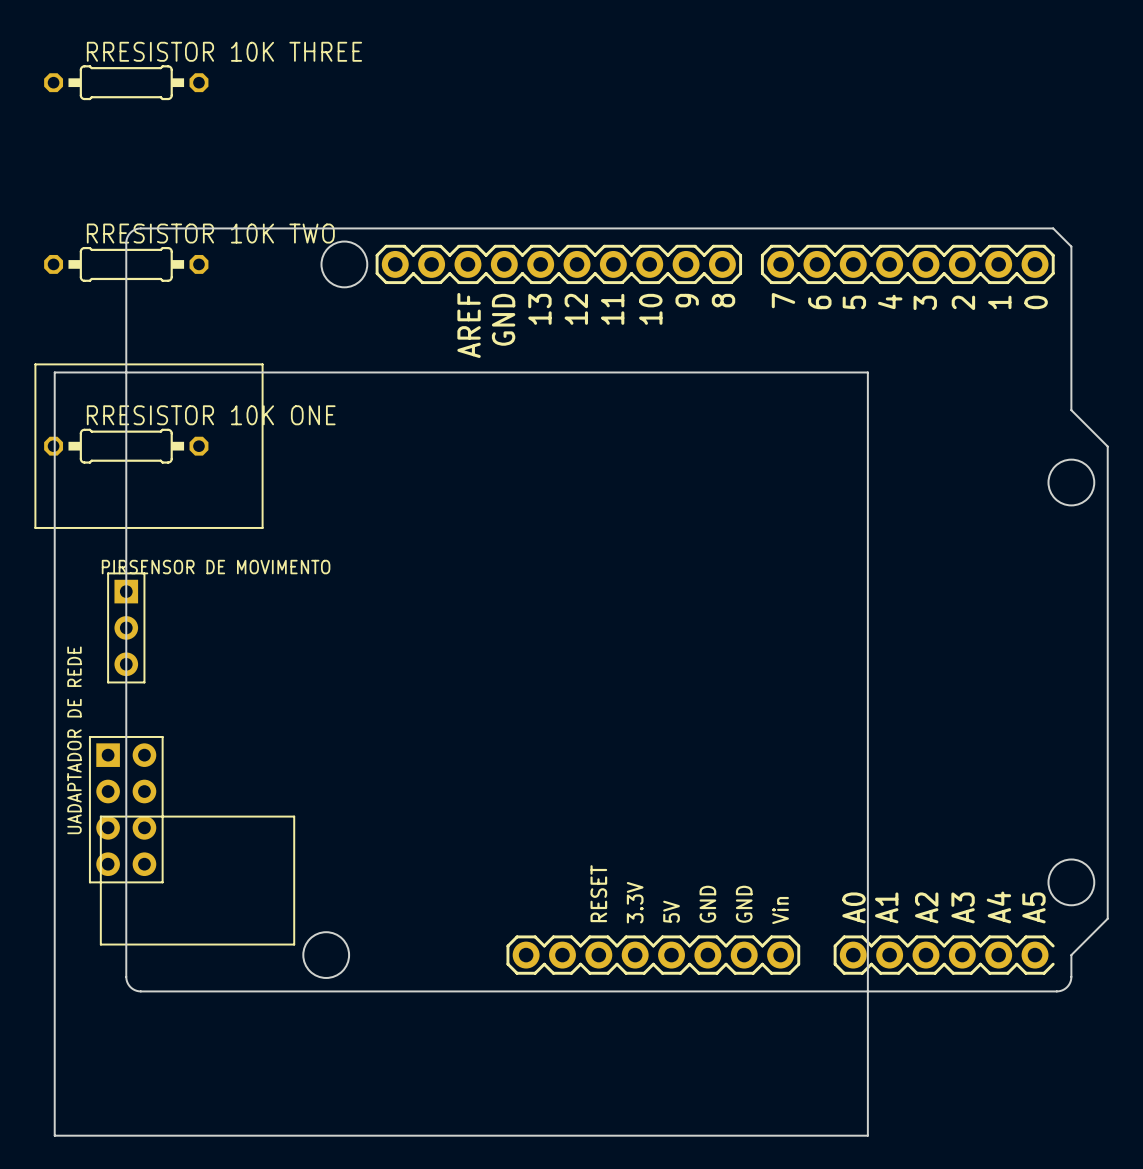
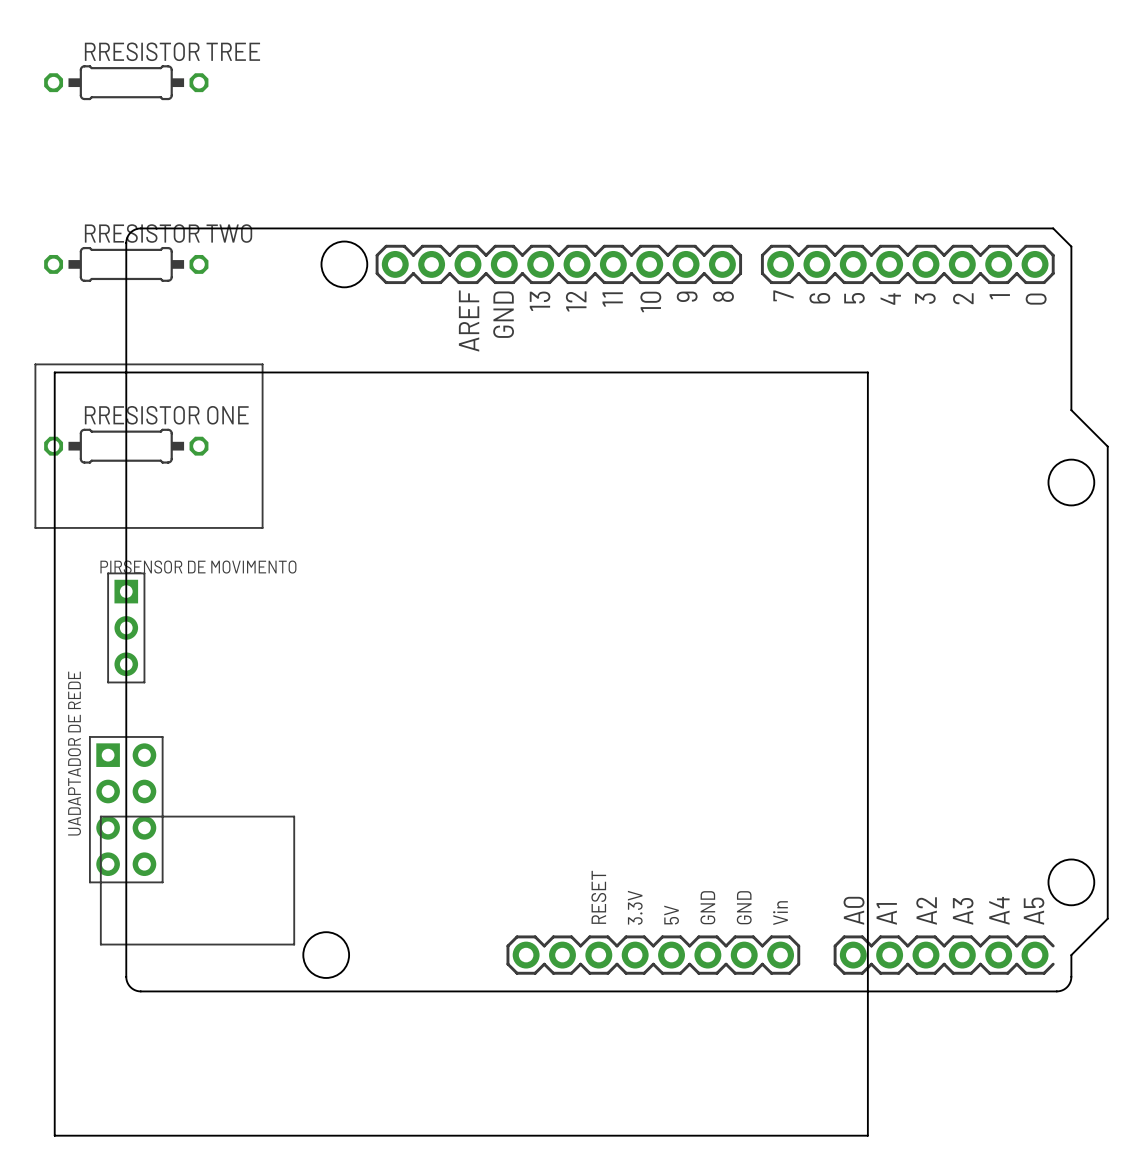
RRESISTOR 10K THREE name: RRESISTOR 10K THREE (224, 51) -> RRESISTOR TREE (172, 51)
RRESISTOR 10K TWO name: RRESISTOR 10K TWO (210, 233) -> RRESISTOR TWO (168, 233)
RRESISTOR 10K ONE name: RRESISTOR 10K ONE (211, 415) -> RRESISTOR ONE (166, 415)

